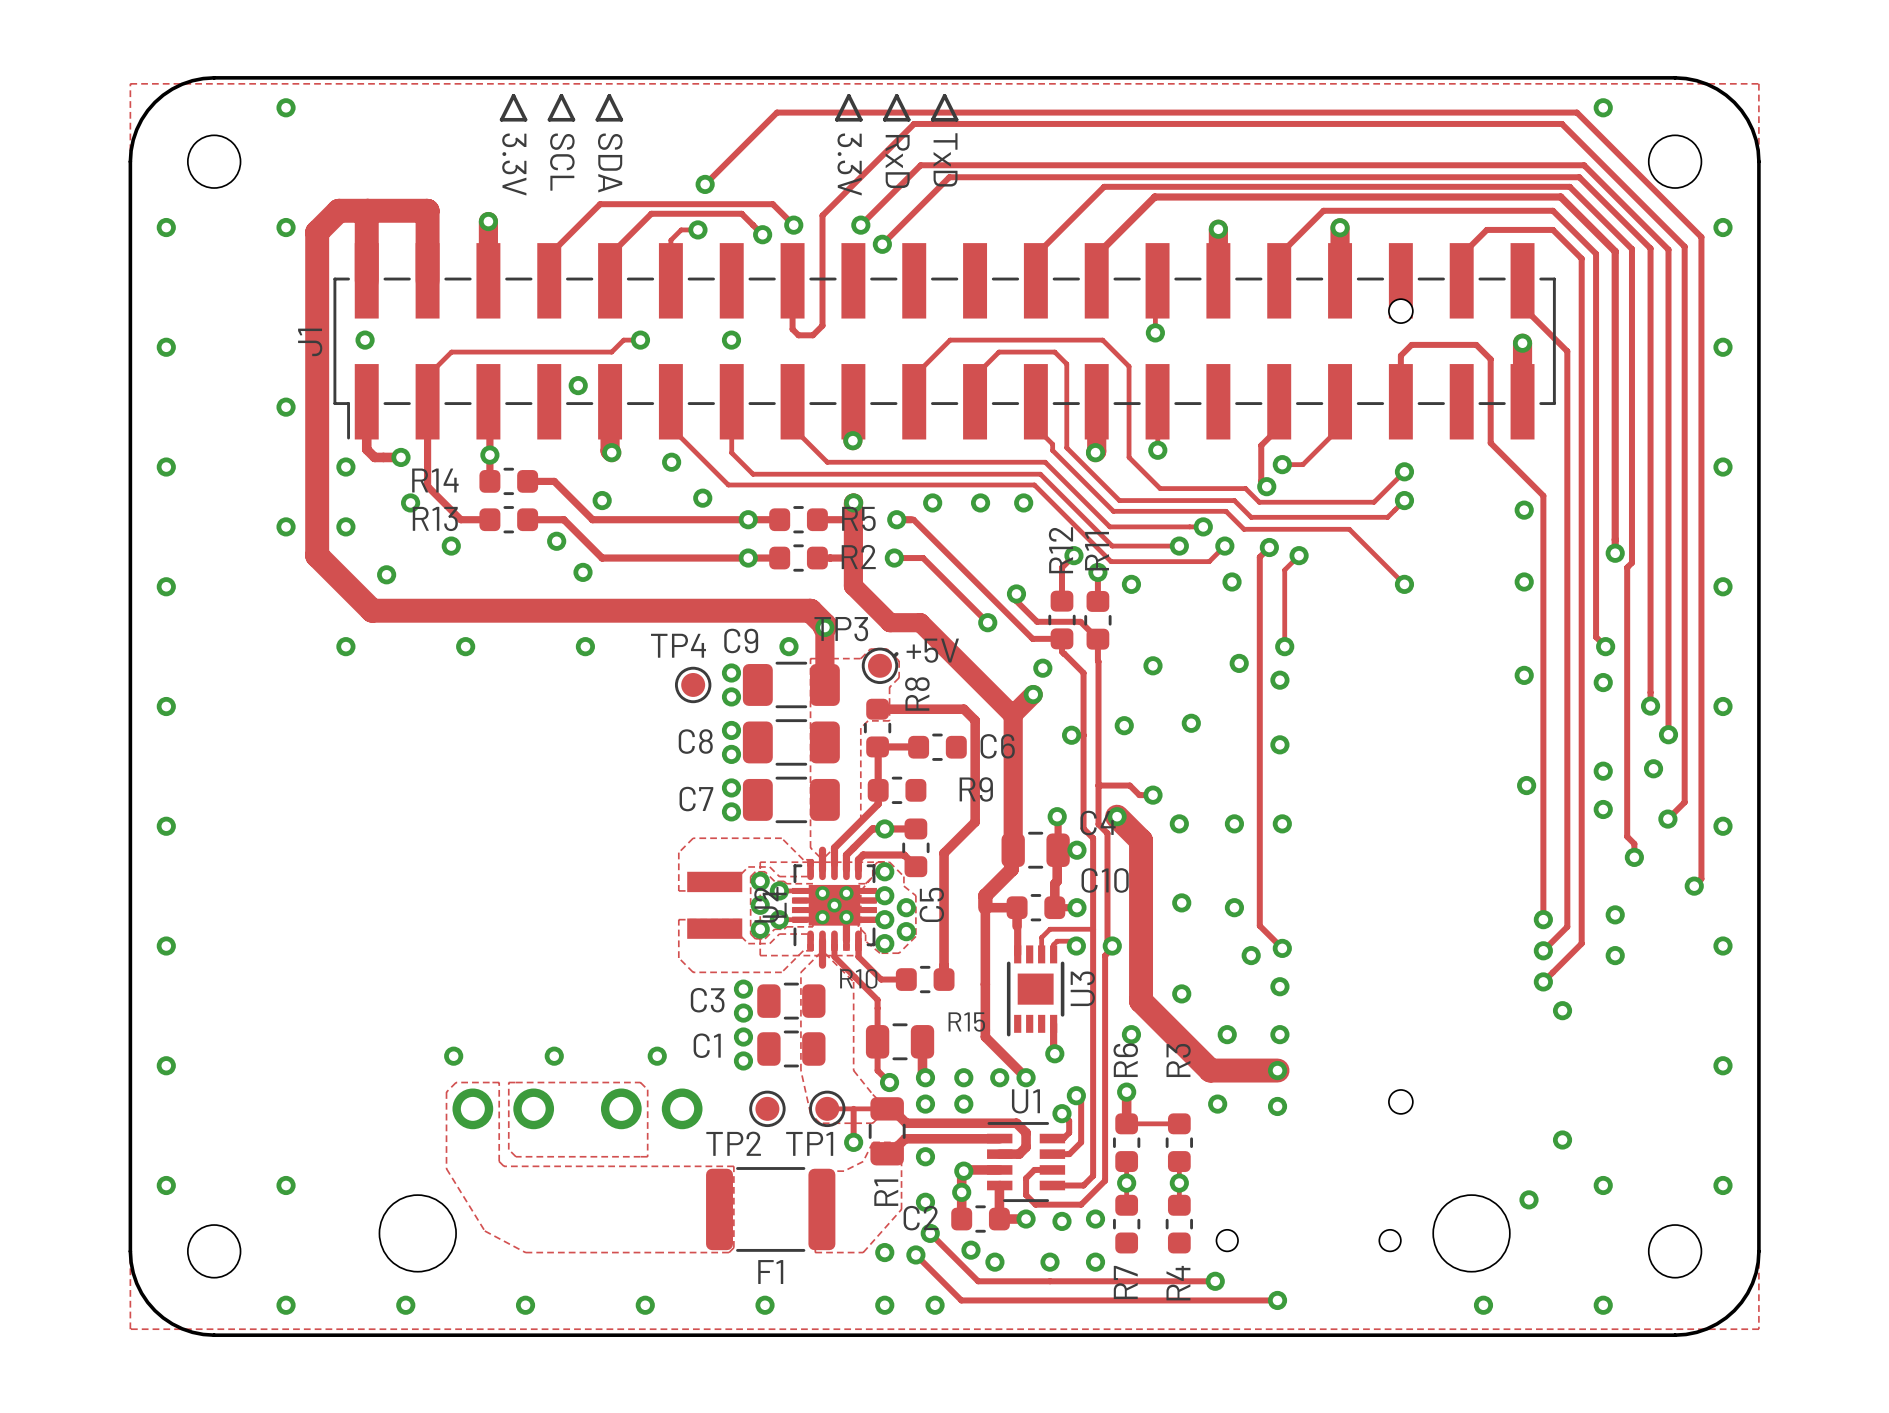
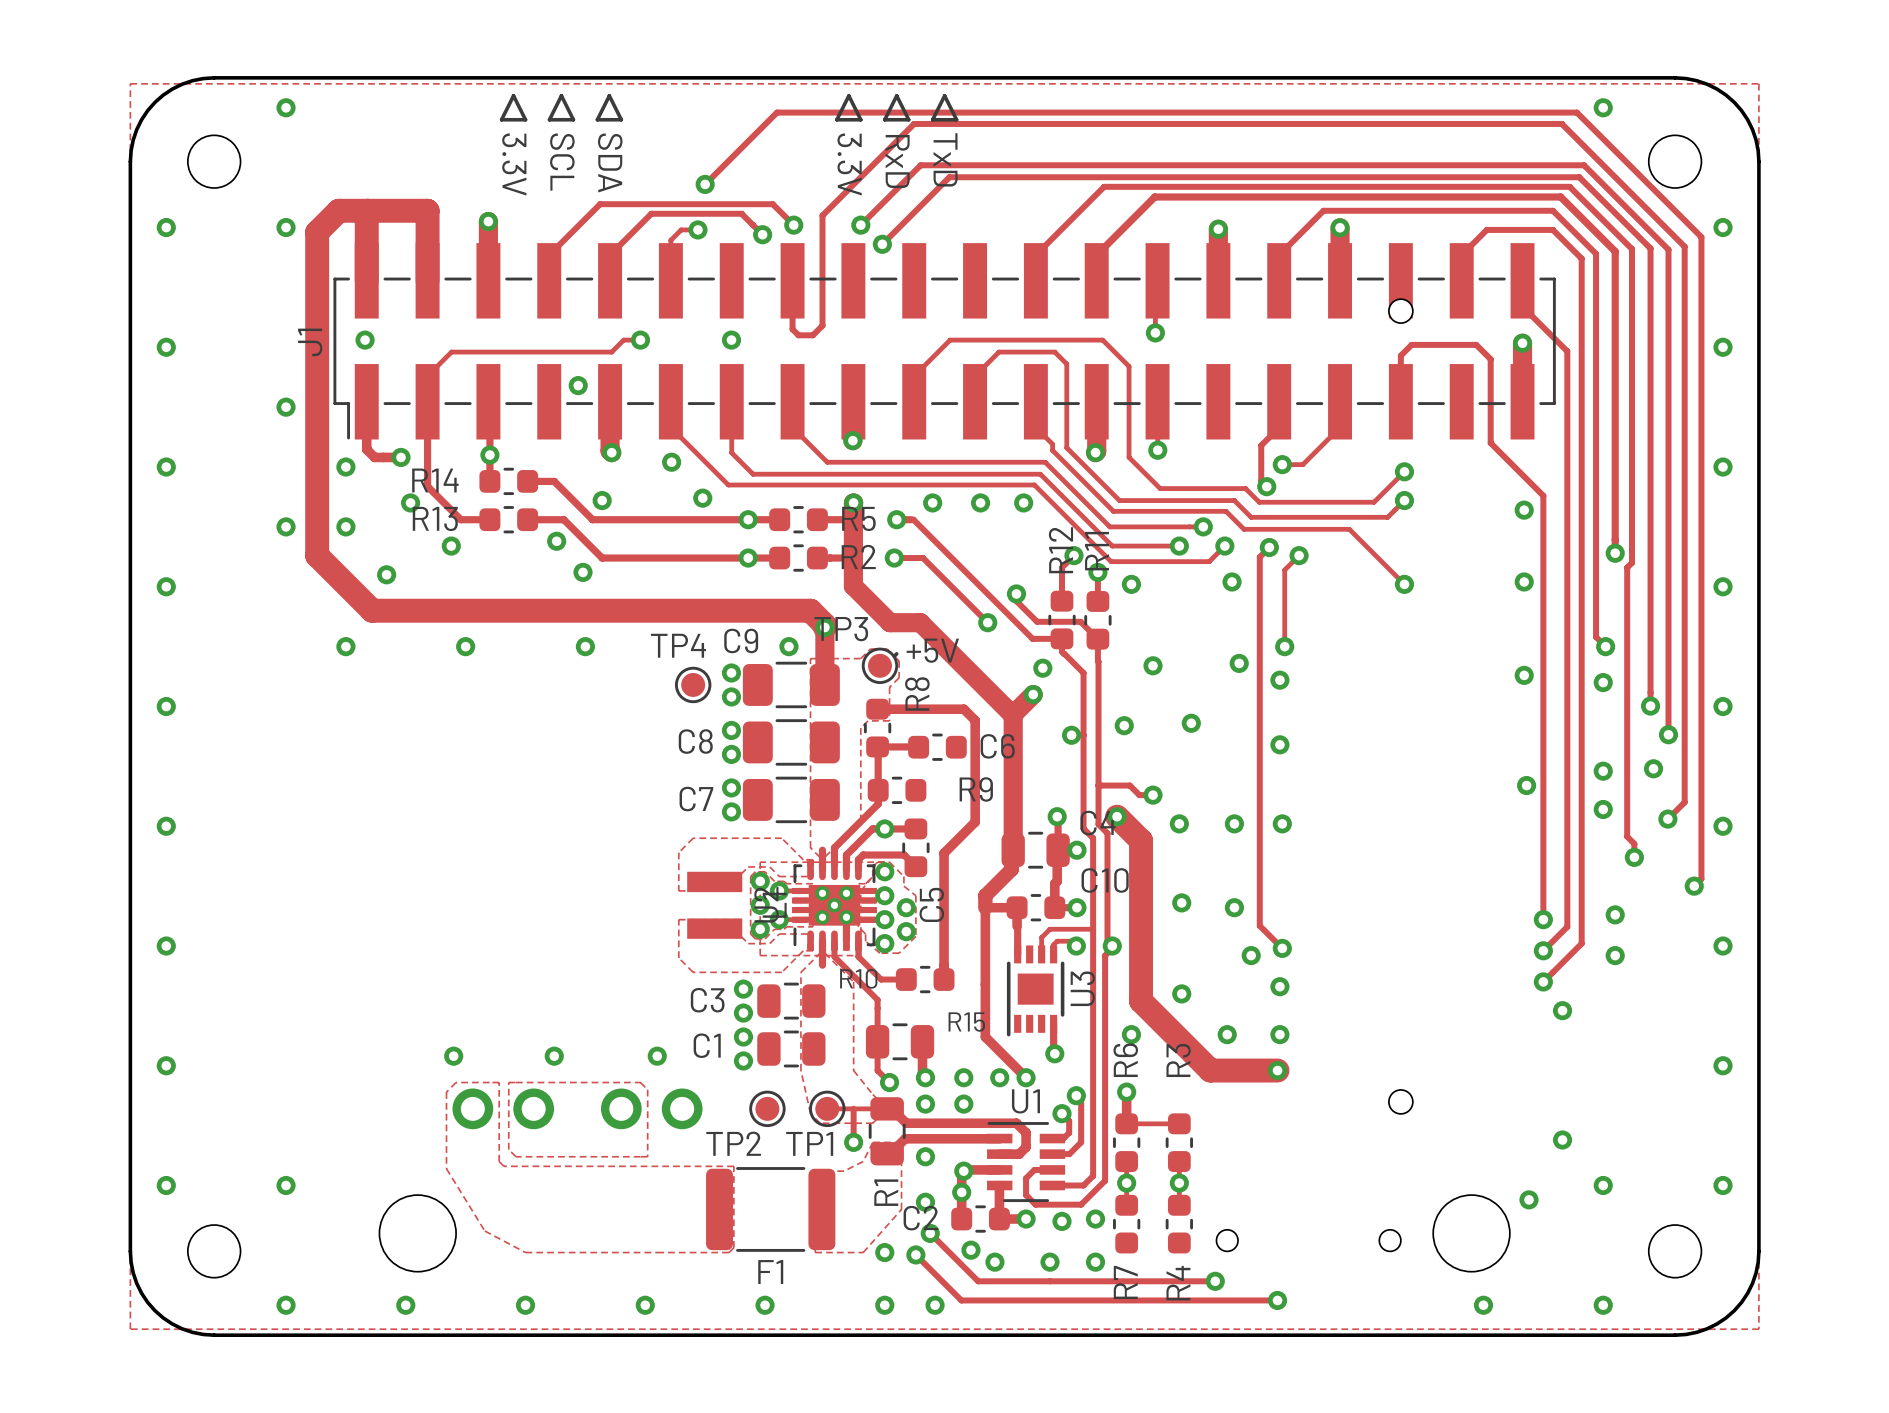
via: (1217, 1104) -> none
via: (1277, 1106) -> none

